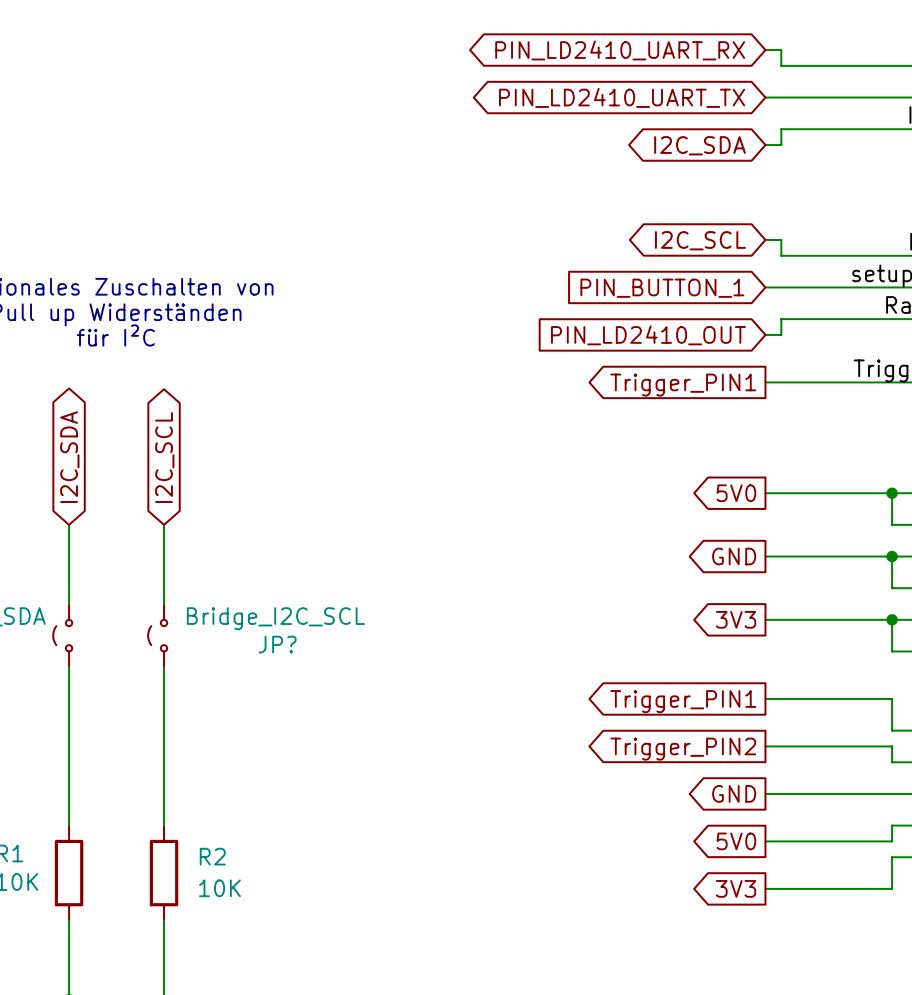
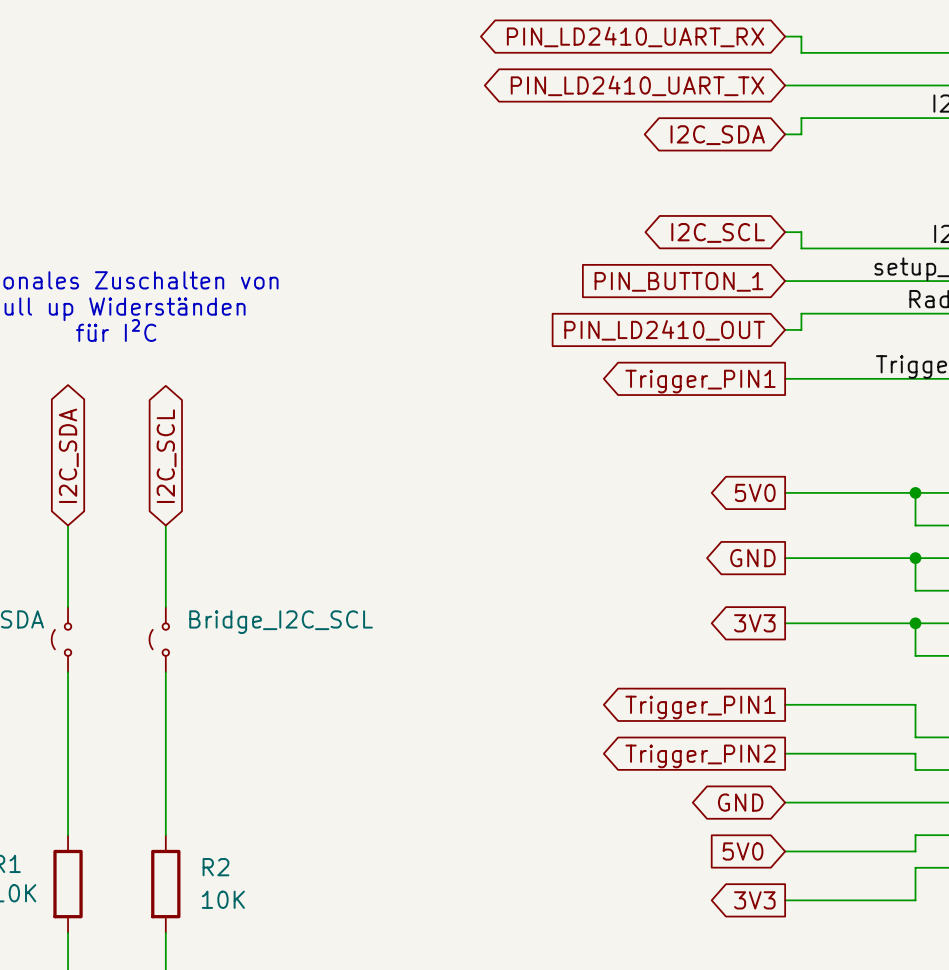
JP? name: JP? (277, 644) -> none
global label shape: output (734, 793) -> bidirectional (740, 802)
global label shape: output (736, 841) -> input (743, 851)

